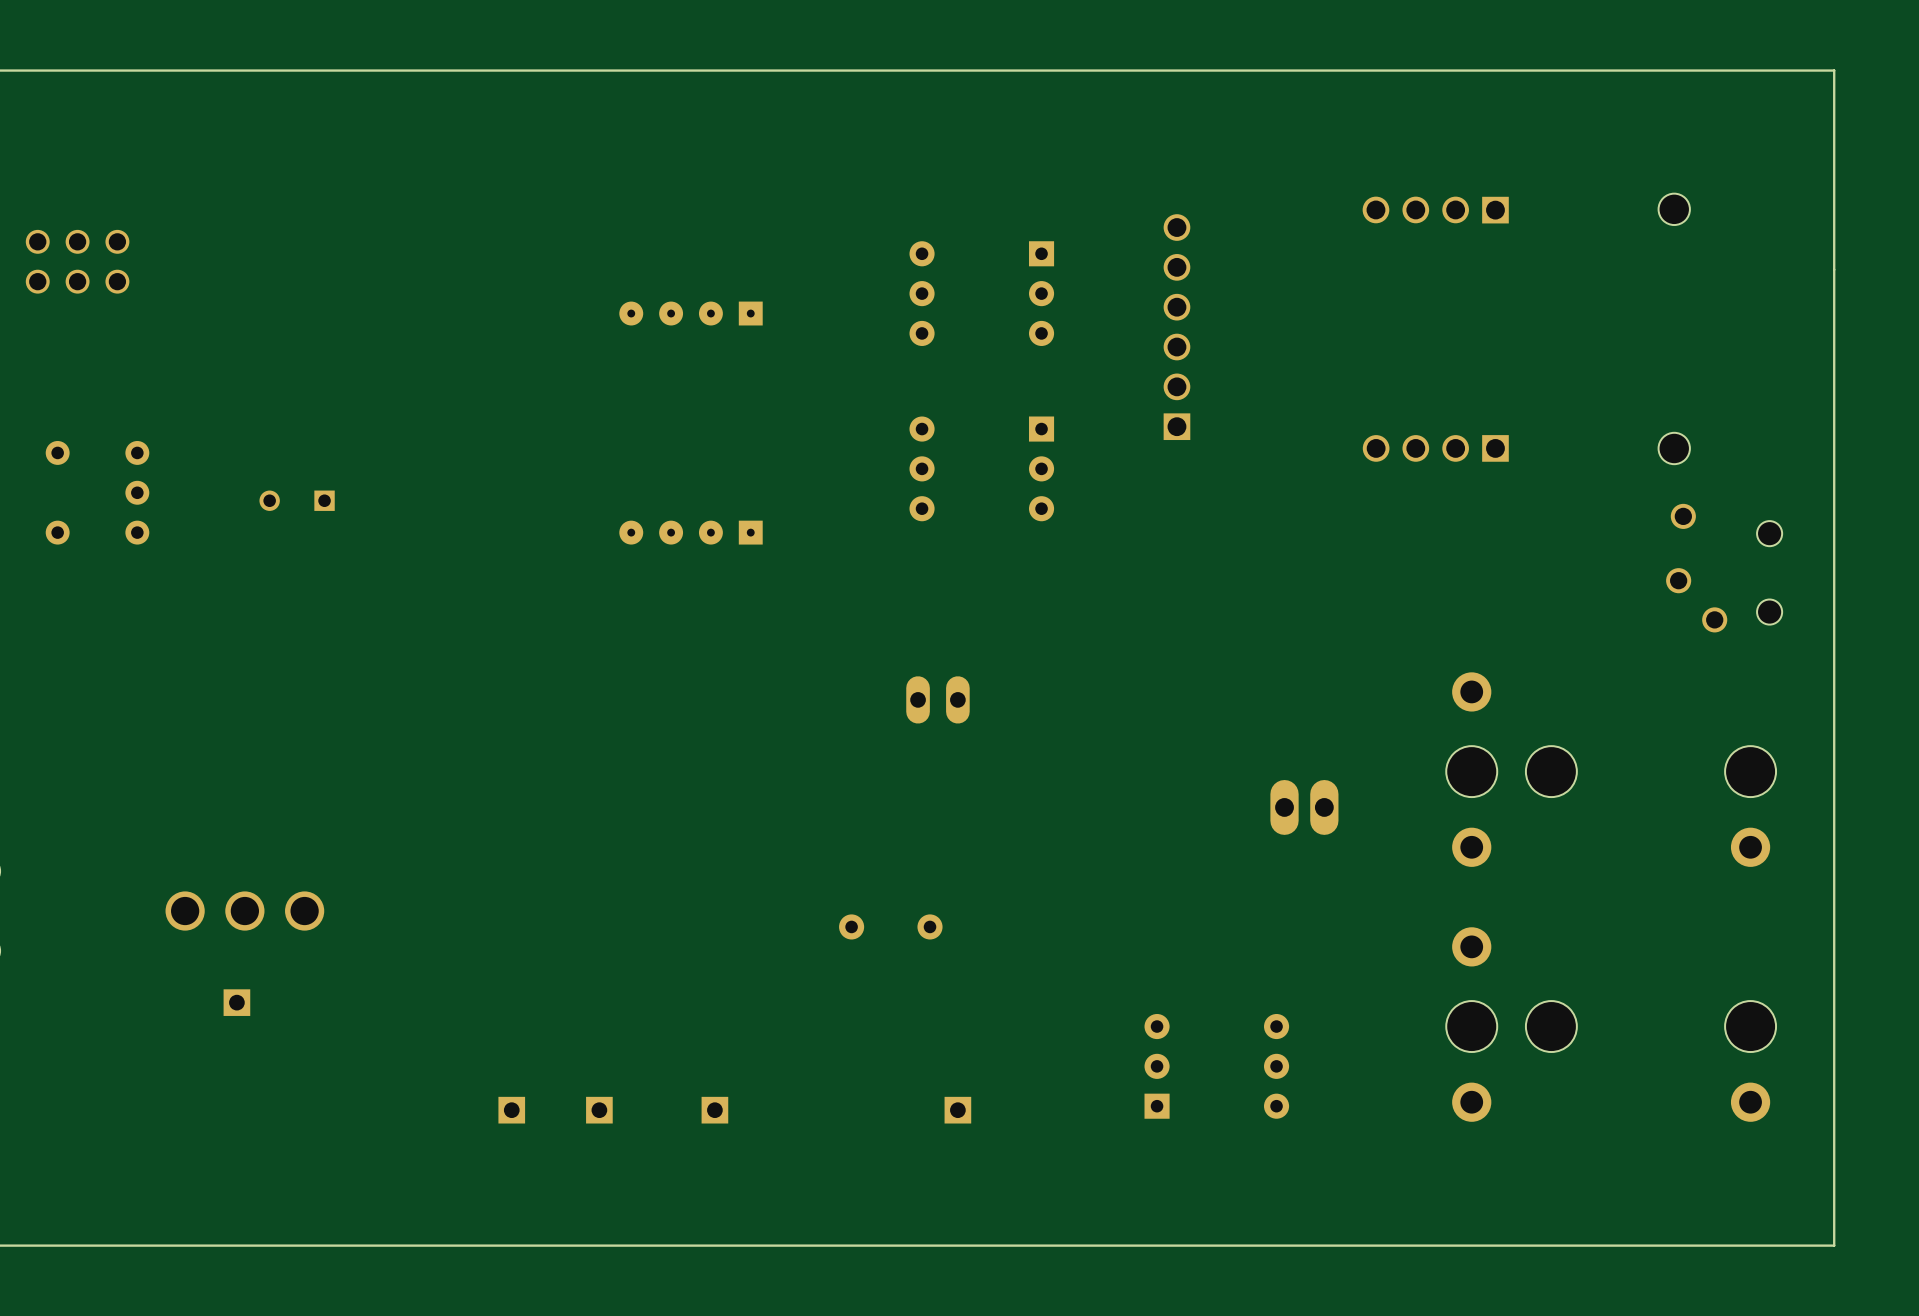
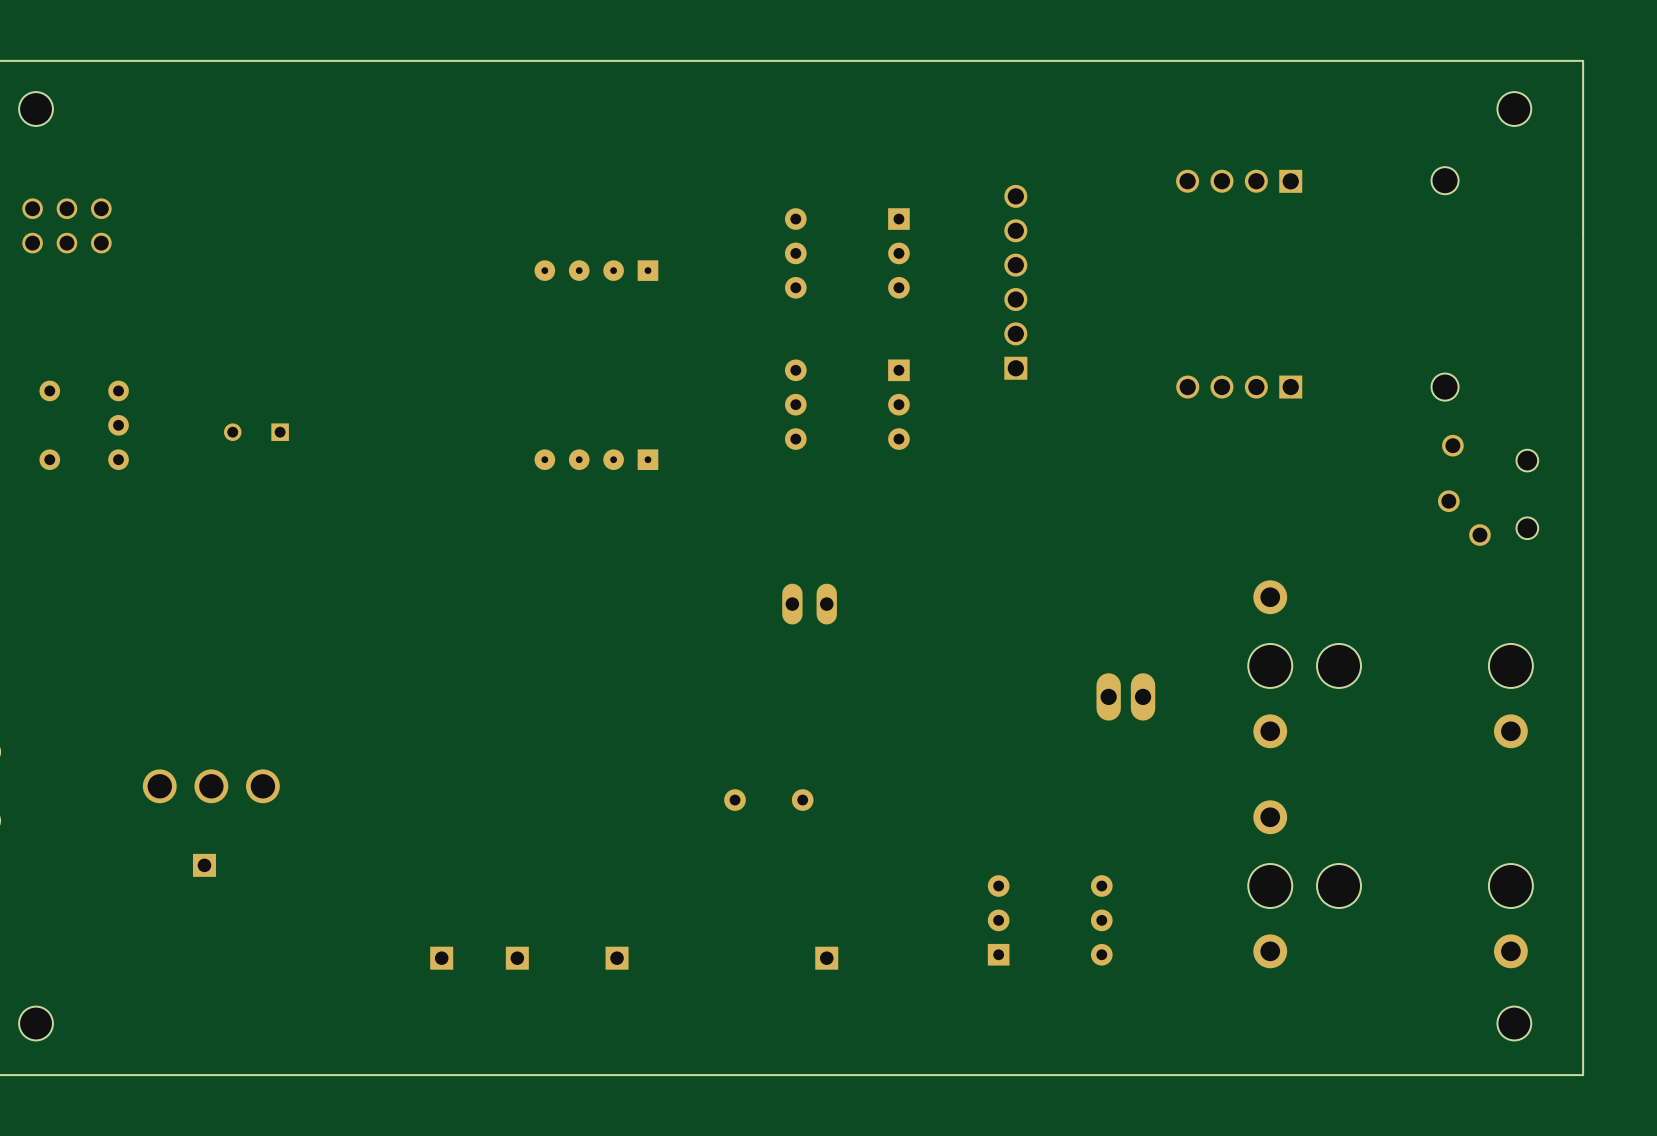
part: none -> (36, 109)
part: none -> (1514, 109)
part: none -> (36, 1023)
part: none -> (1514, 1023)

